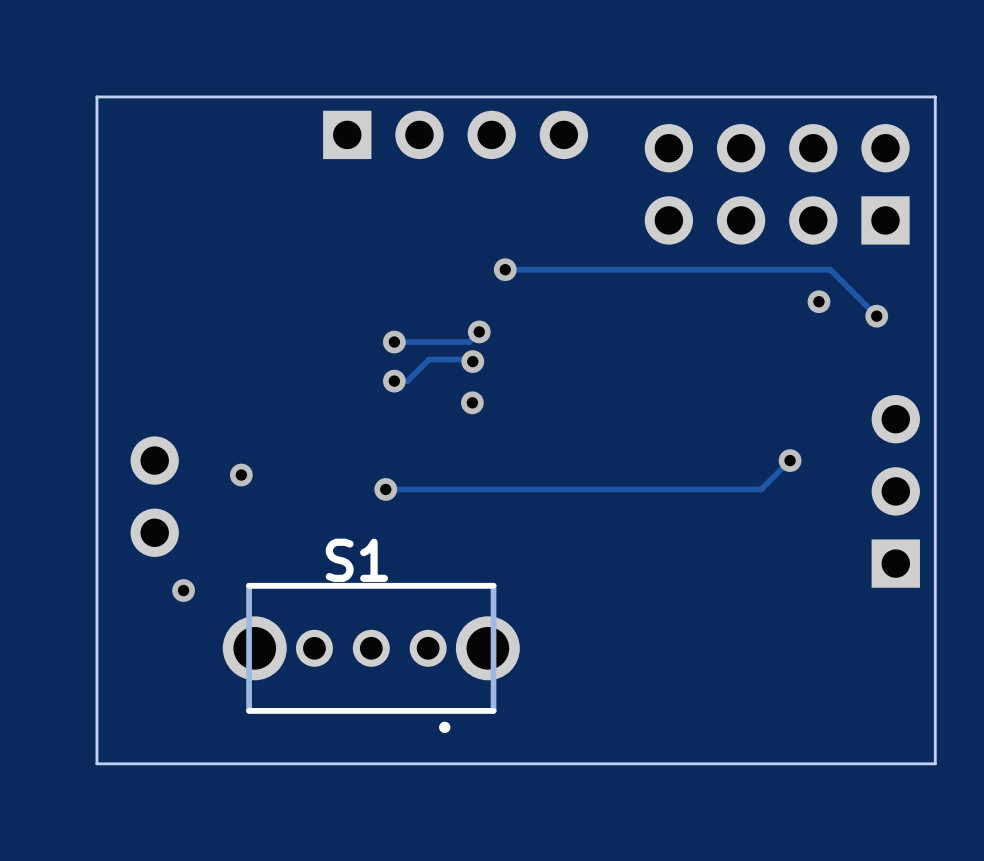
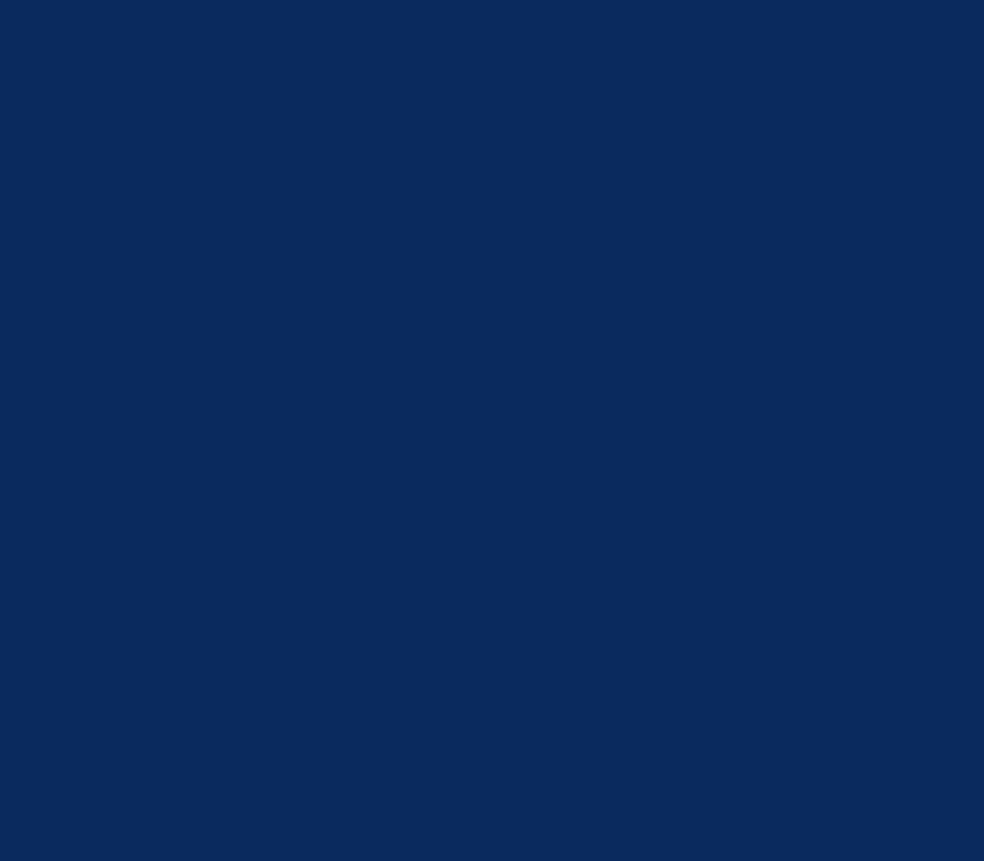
board edge: (935, 96) (96, 96) (96, 763) (935, 763) (935, 96) -> none
part: (455, 134) -> none
part: (777, 184) -> none
track: (505, 269) (830, 269) (876, 316) -> none
via: (505, 269) -> none
via: (818, 301) -> none
via: (876, 316) -> none
track: (479, 331) (469, 342) (394, 342) -> none
via: (479, 331) -> none
via: (394, 342) -> none
track: (472, 361) (470, 359) (429, 359) (407, 381) (394, 381) -> none
via: (472, 361) -> none
via: (394, 381) -> none
via: (472, 402) -> none
track: (790, 460) (761, 489) (385, 489) -> none
via: (790, 460) -> none
via: (241, 475) -> none
via: (385, 489) -> none
part: (895, 491) -> none
part: (154, 496) -> none
via: (183, 590) -> none
S1: (371, 657) -> none

